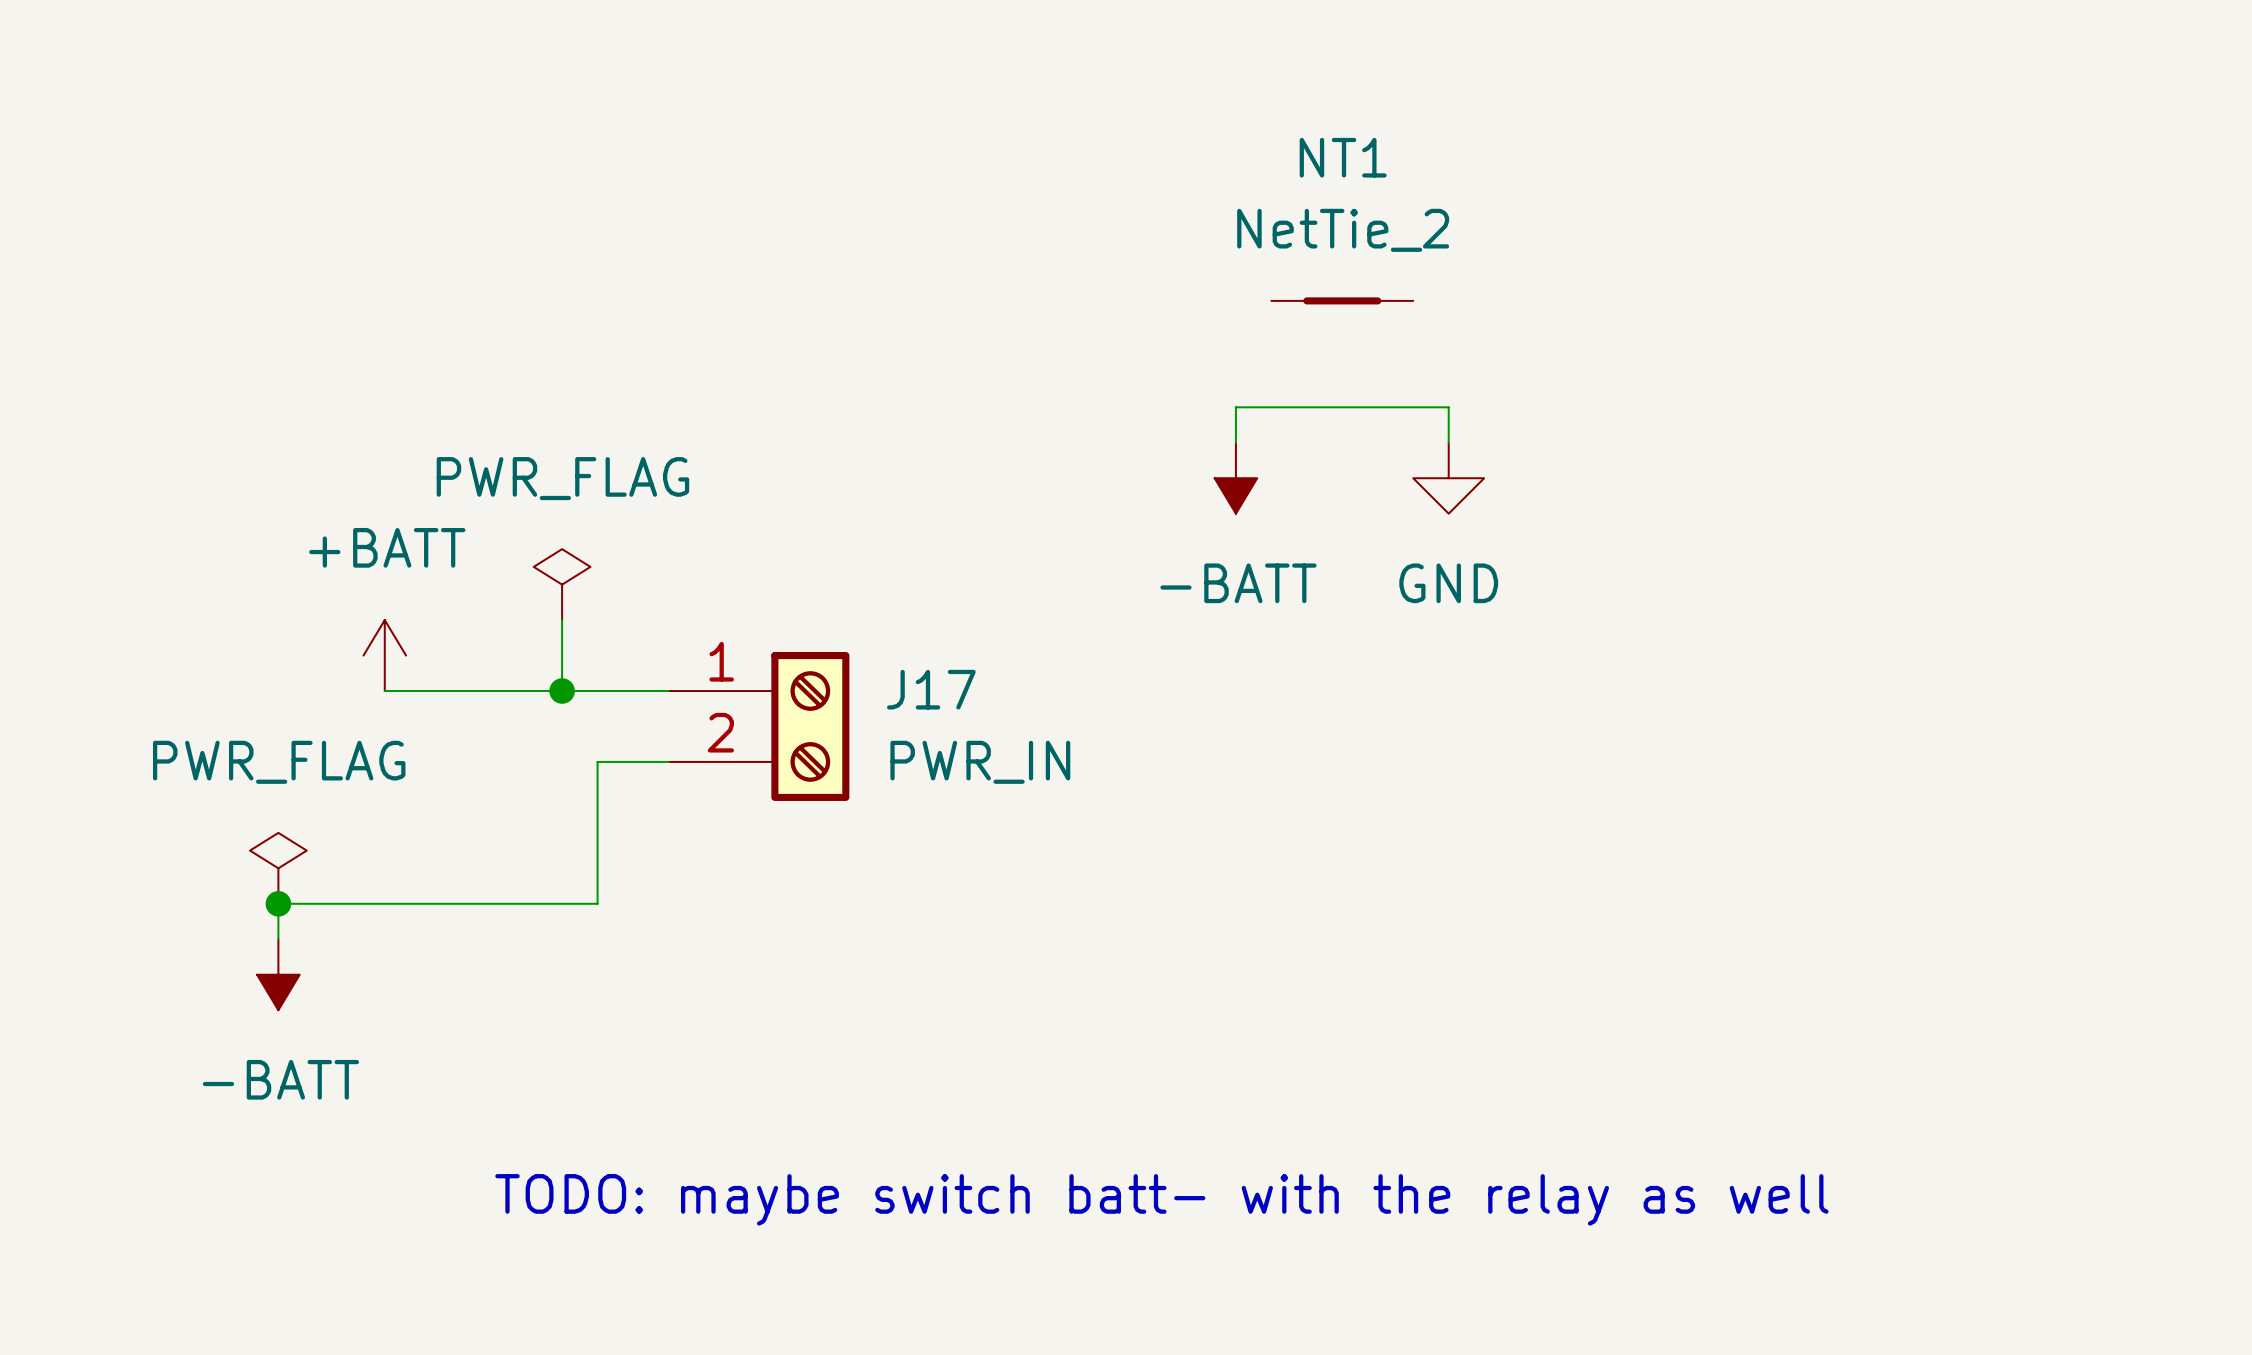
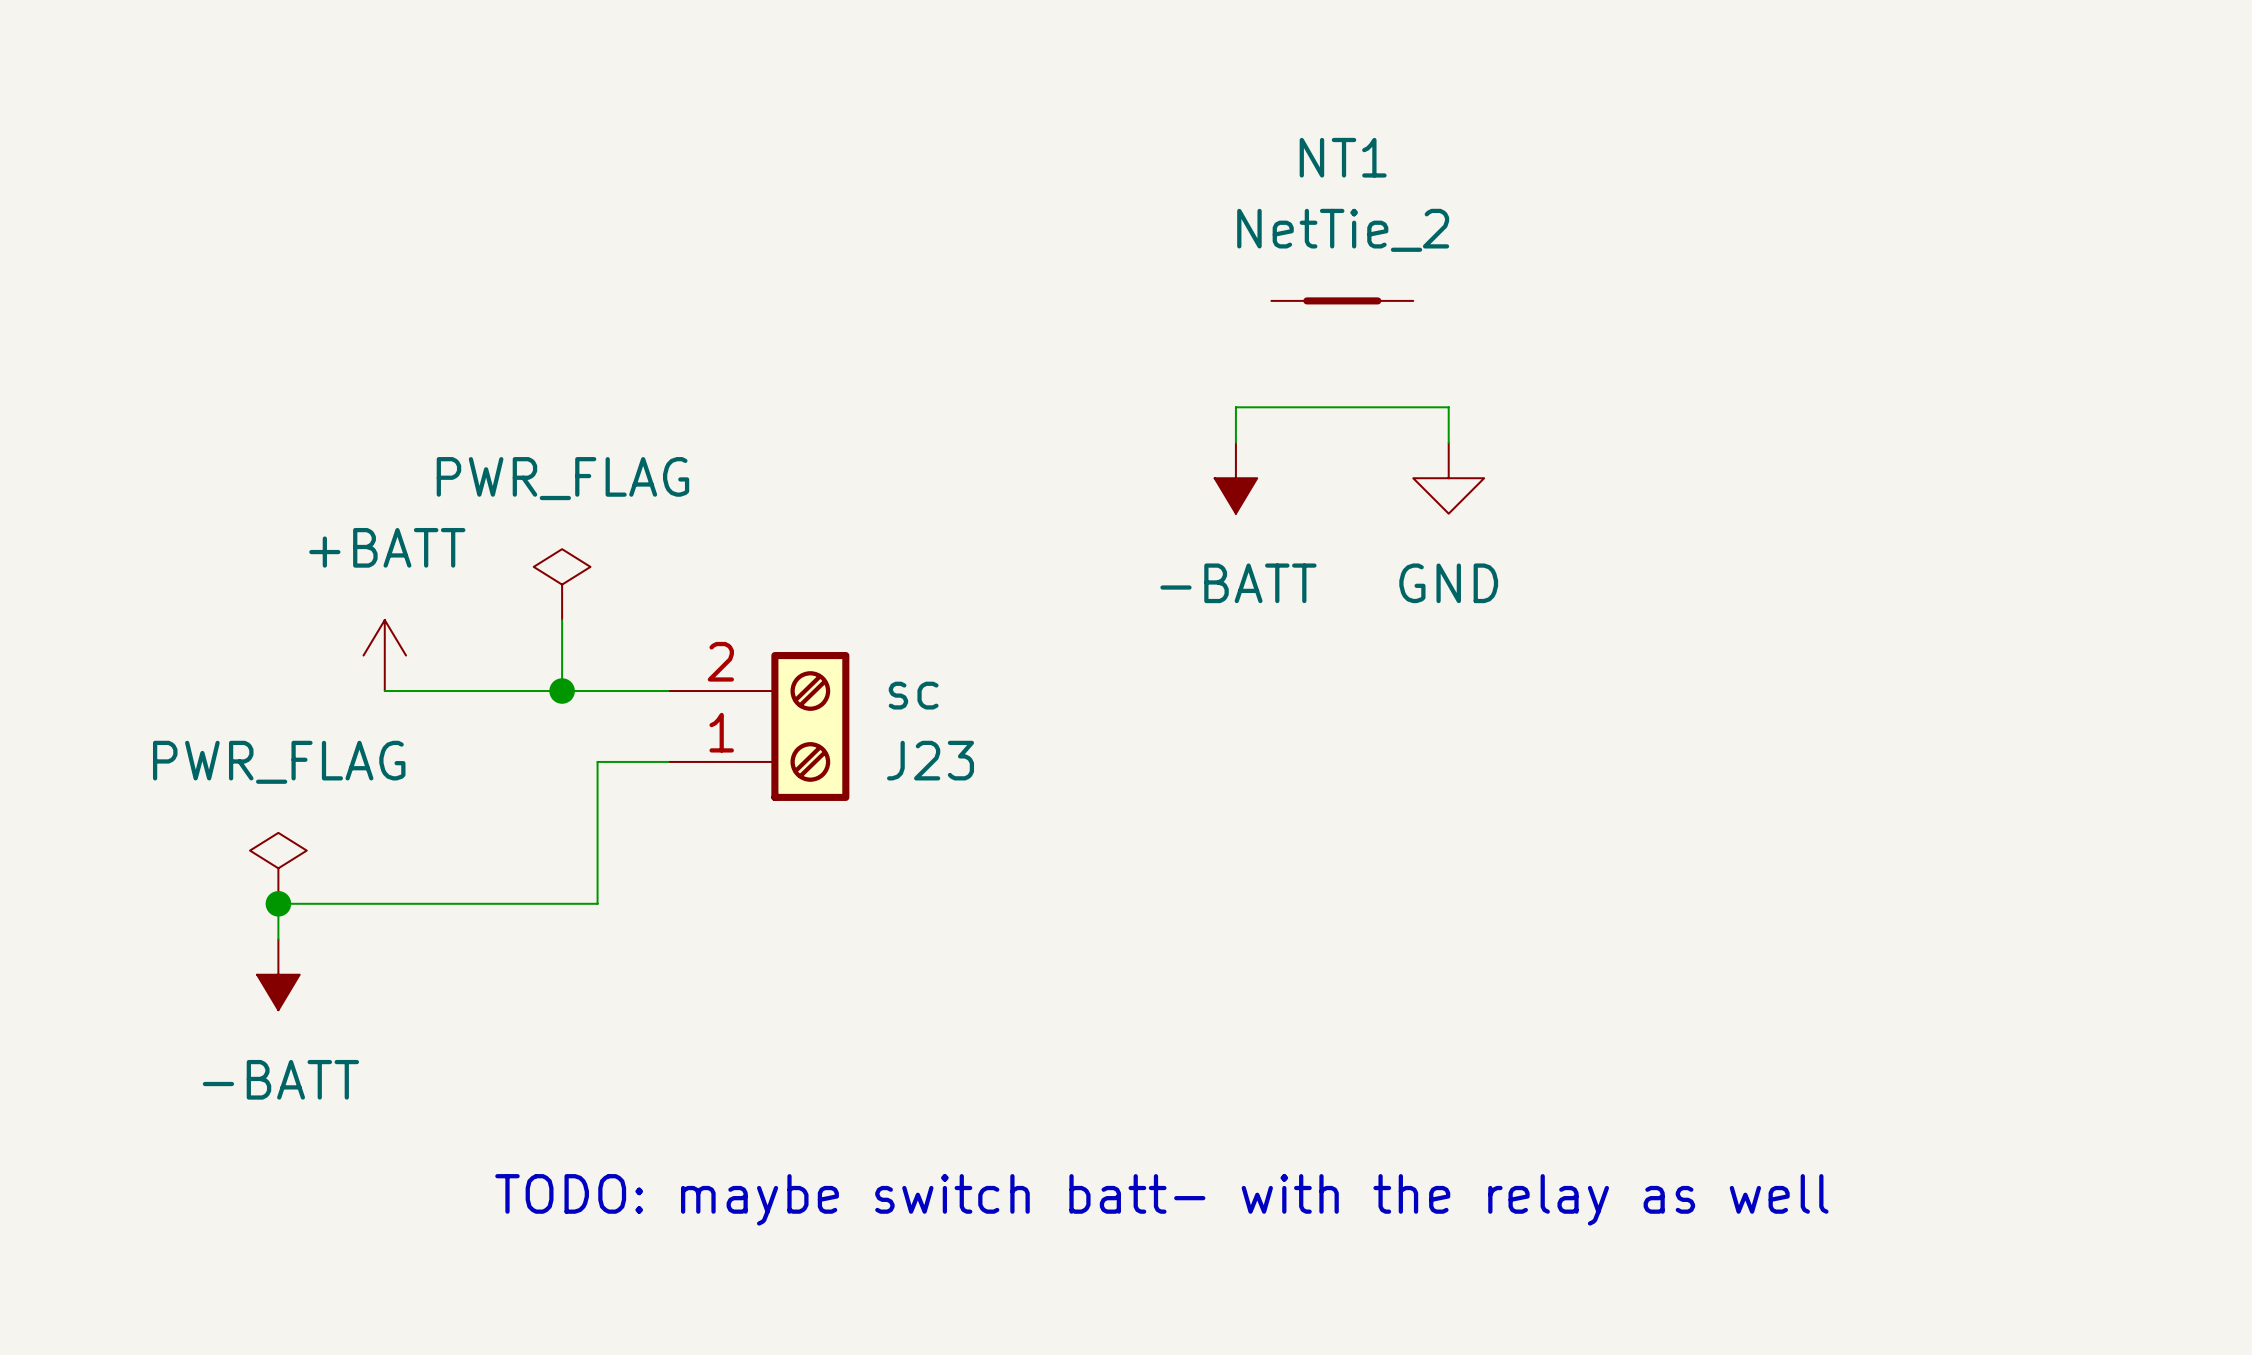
J17: PWR_IN (758, 726) -> none
J23: none -> sc (758, 726)

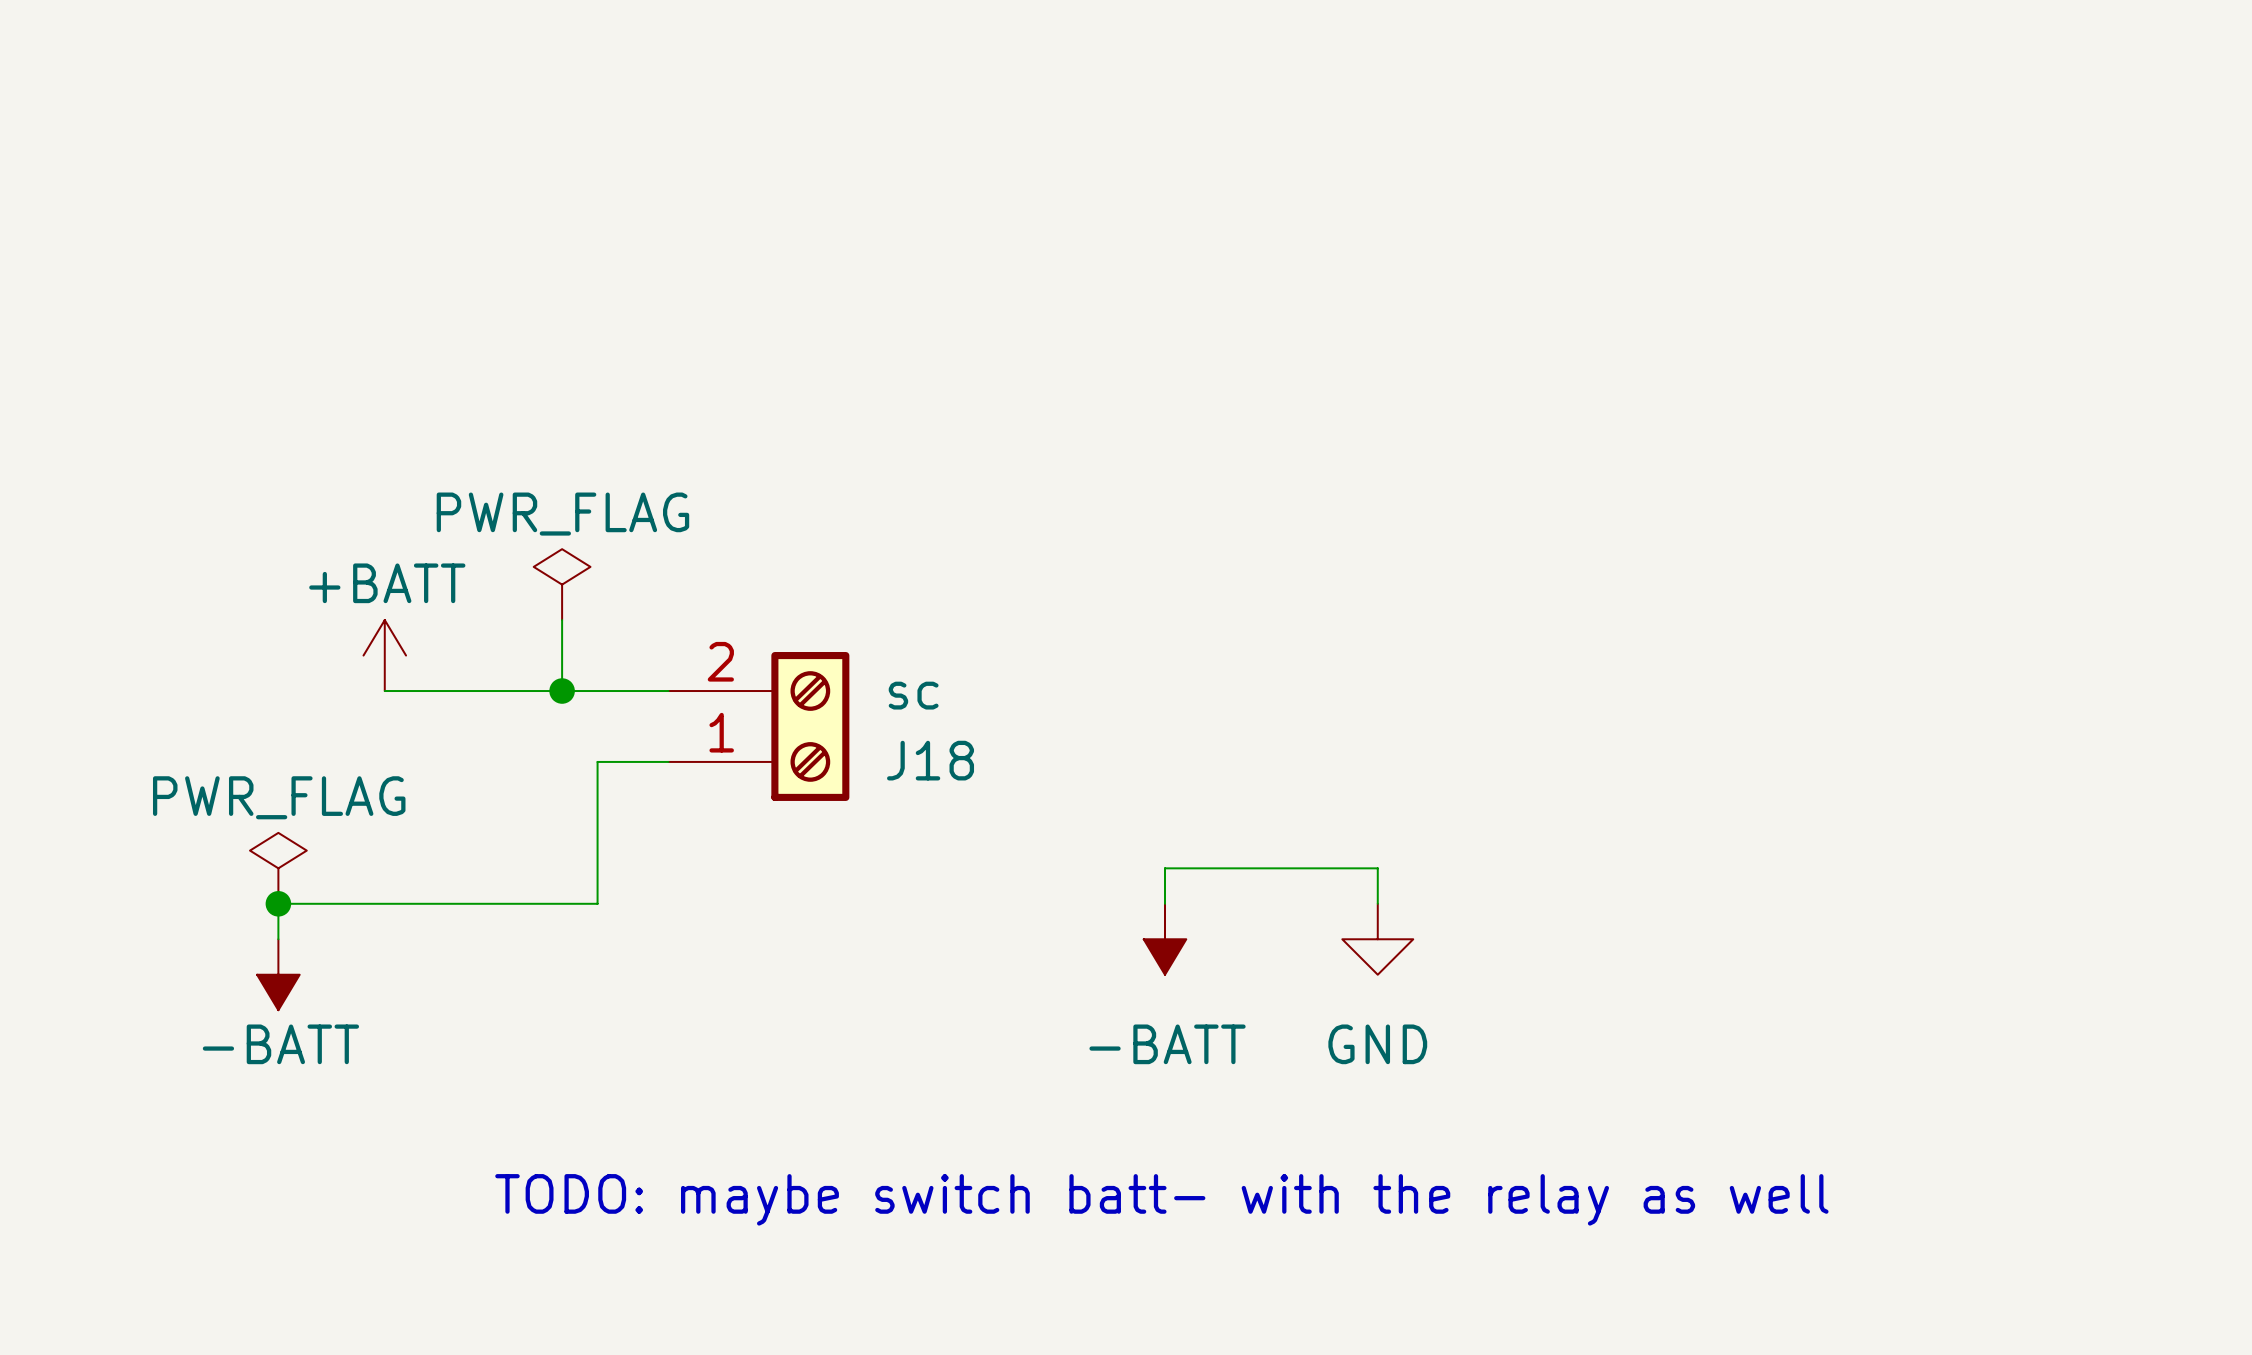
NT1: NetTie_2 (1342, 300) -> none
wire: (1235, 442) (1235, 407) (1448, 407) (1448, 442) -> (1165, 903) (1165, 868) (1377, 868) (1377, 903)
power symbol text position: PWR_FLAG (562, 478) -> PWR_FLAG (562, 514)
power symbol position: -BATT (1235, 478) -> -BATT (1165, 939)
power symbol position: GND (1448, 478) -> GND (1377, 939)
power symbol text position: +BATT (387, 547) -> +BATT (387, 583)
J23 name: J23 (930, 760) -> J18 (930, 760)
power symbol text position: PWR_FLAG (279, 762) -> PWR_FLAG (279, 797)
power symbol text position: -BATT (280, 1079) -> -BATT (280, 1044)

